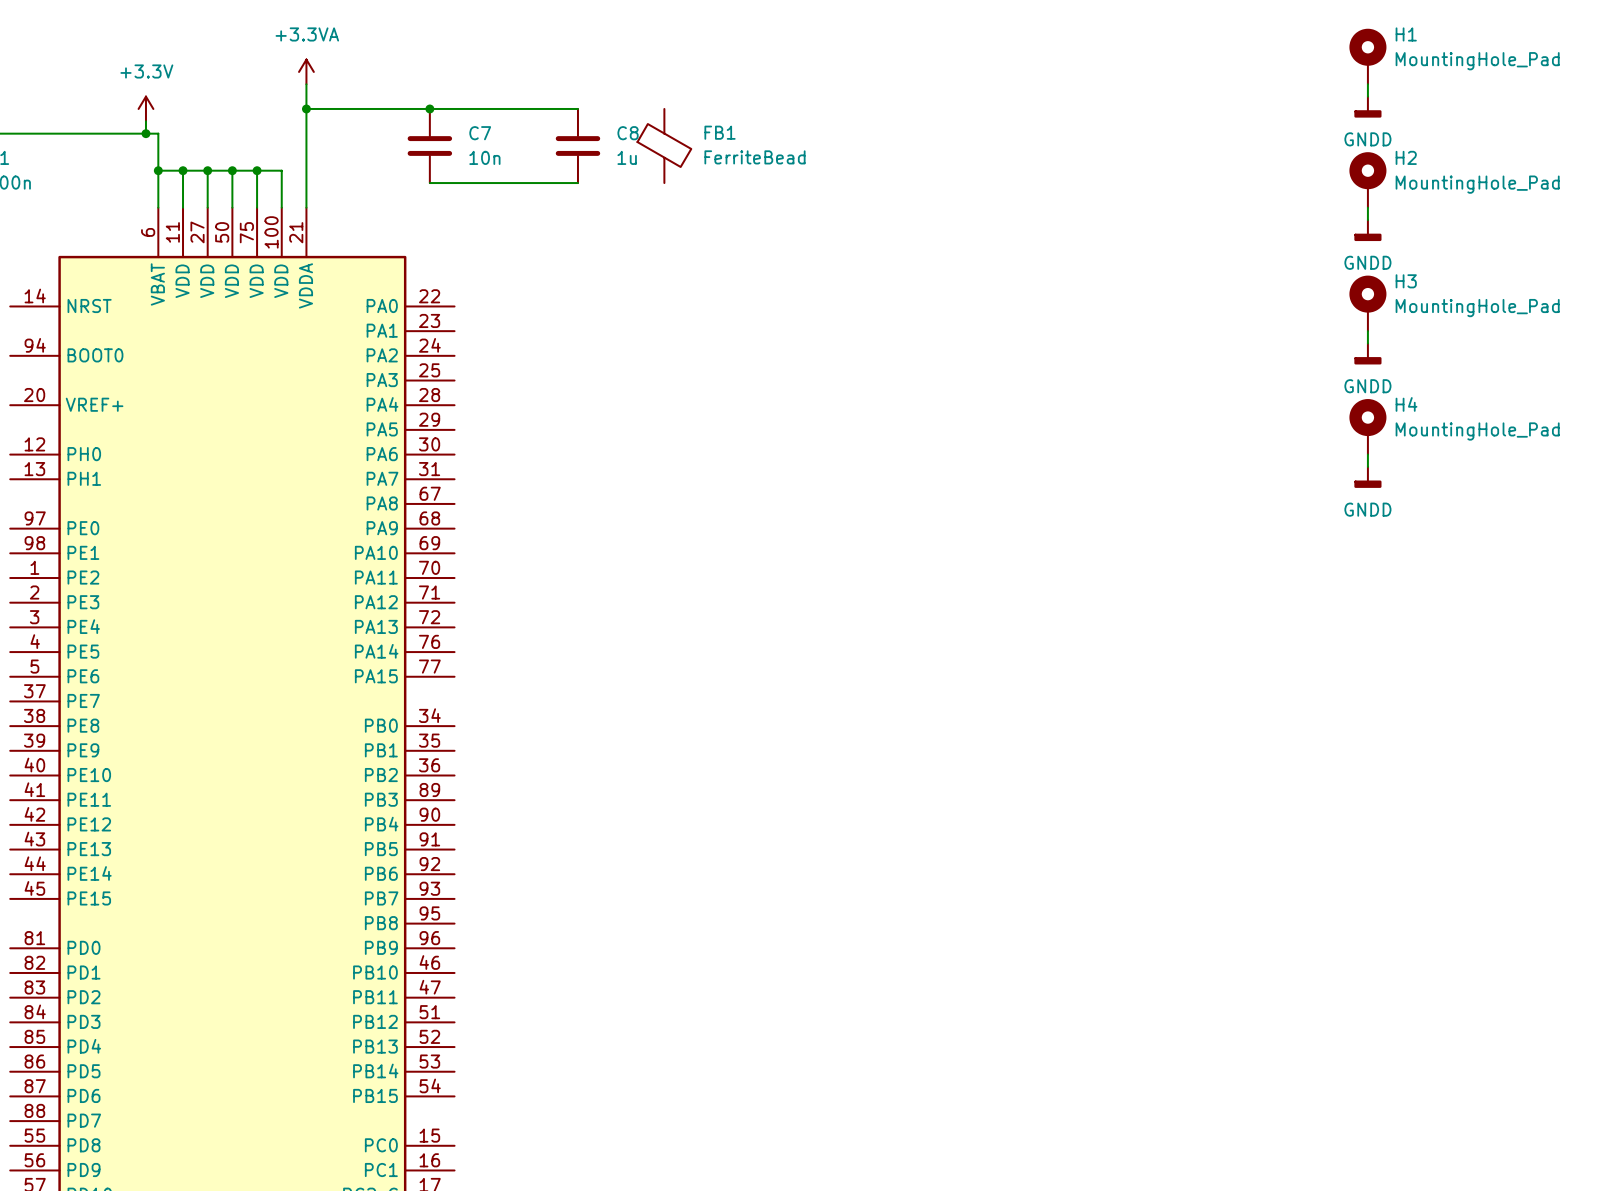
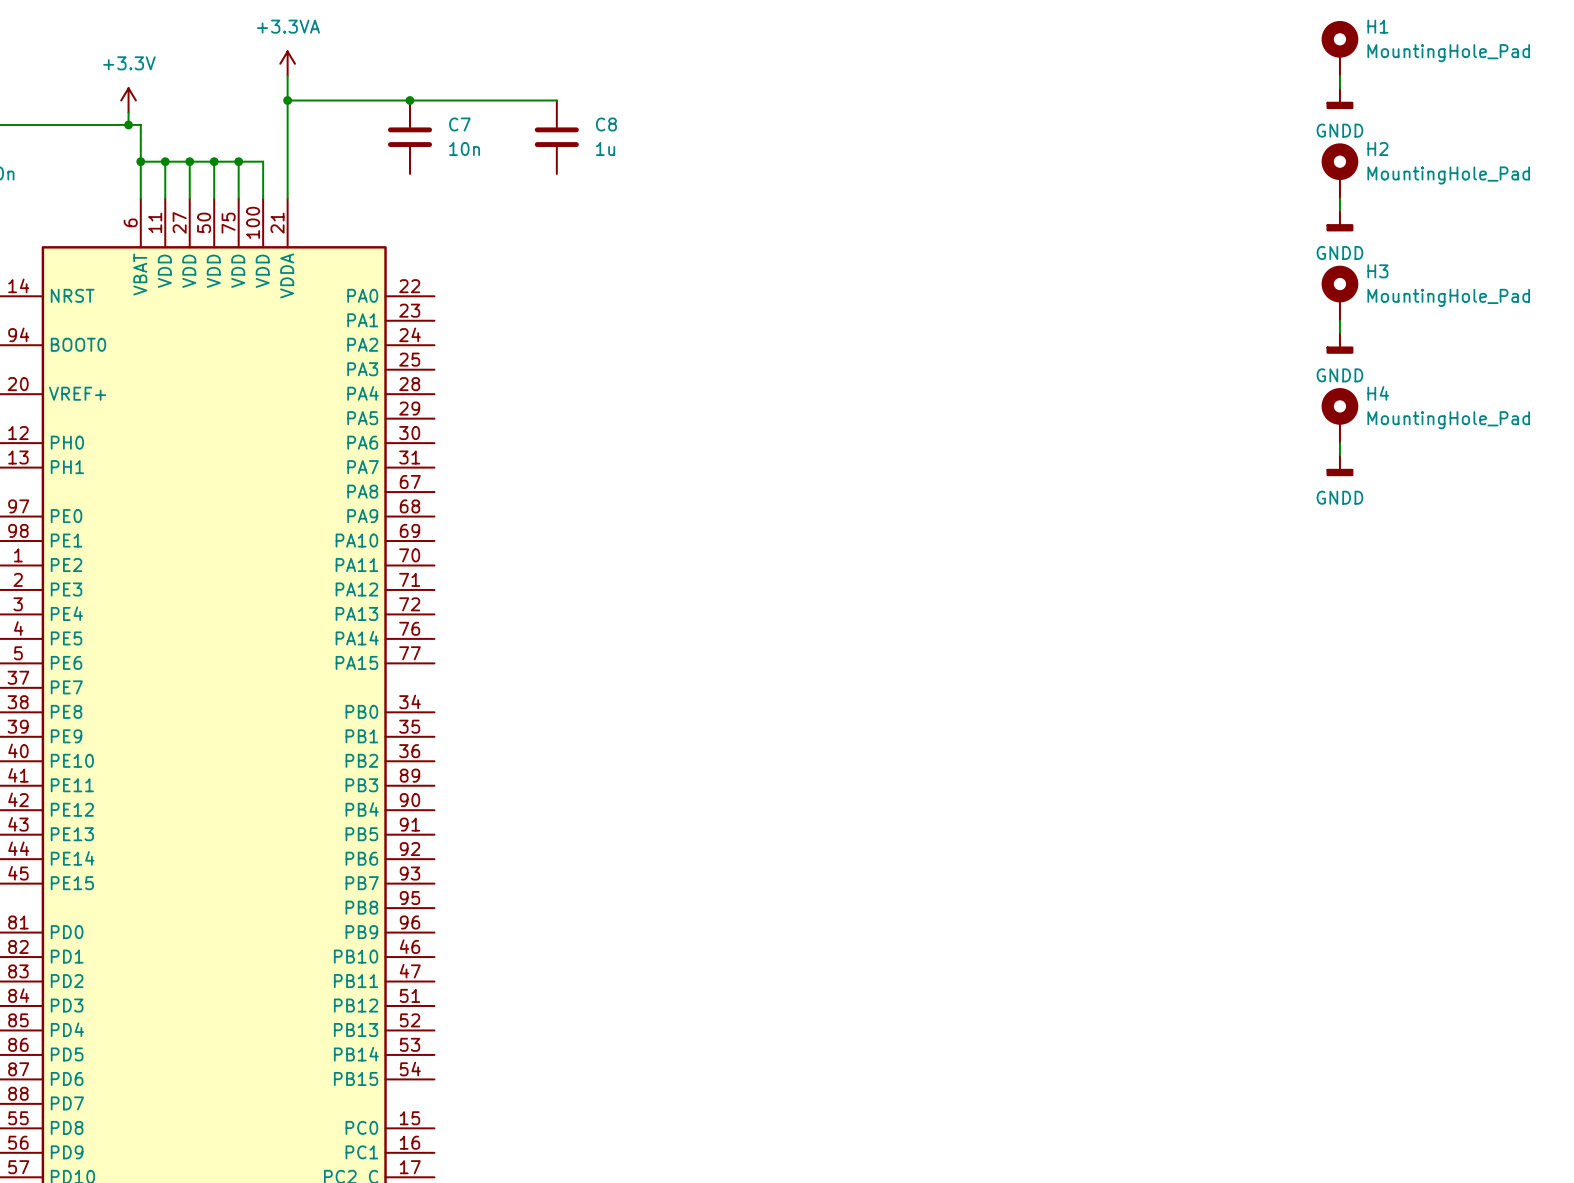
FB1: FerriteBead (664, 146) -> none
wire: (429, 183) (577, 183) -> none

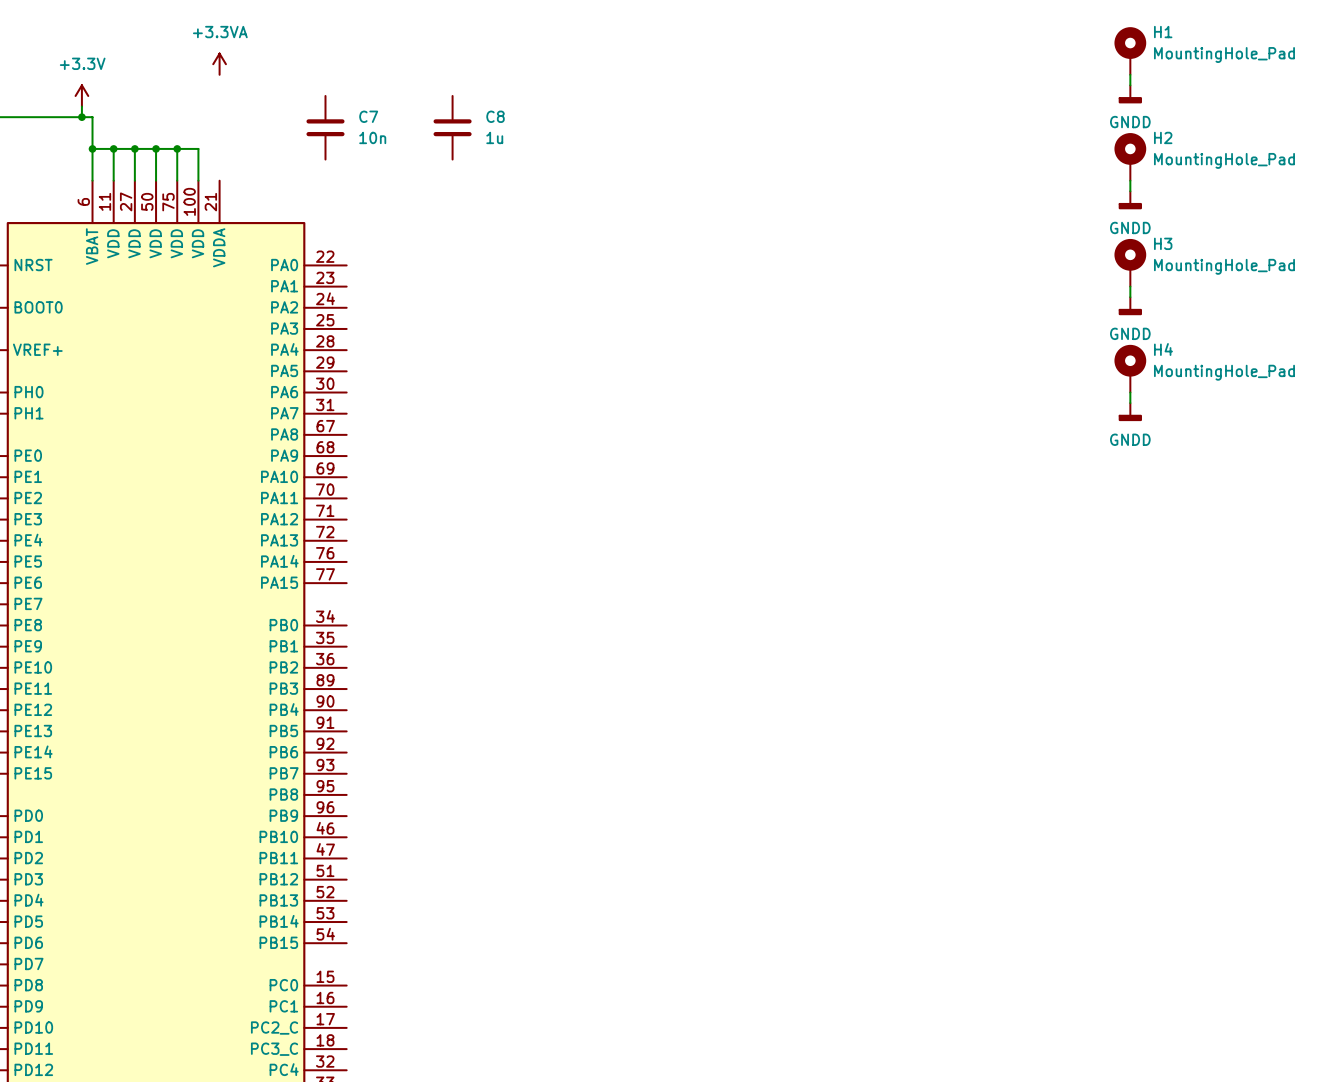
wire: (287, 76) (287, 198) -> none
wire: (287, 100) (556, 100) -> none
junction: (287, 100) -> none
junction: (409, 100) -> none

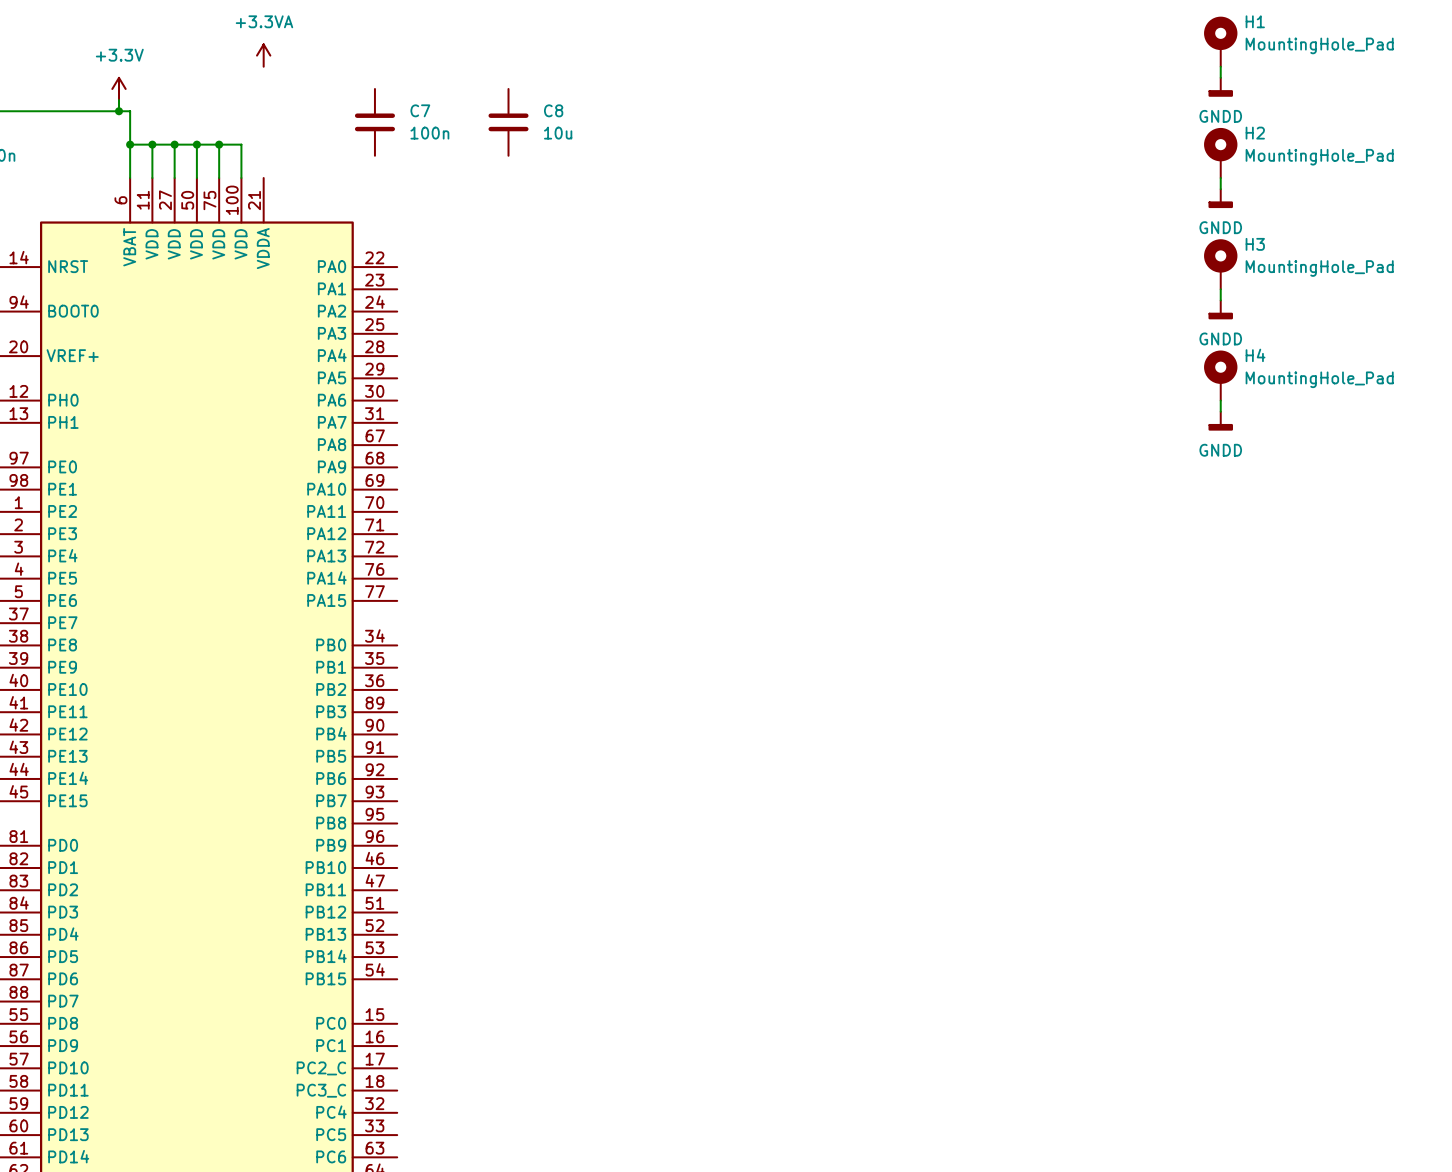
C7 value: 10n (372, 137) -> 100n (429, 133)
C8 value: 1u (494, 137) -> 10u (558, 133)

